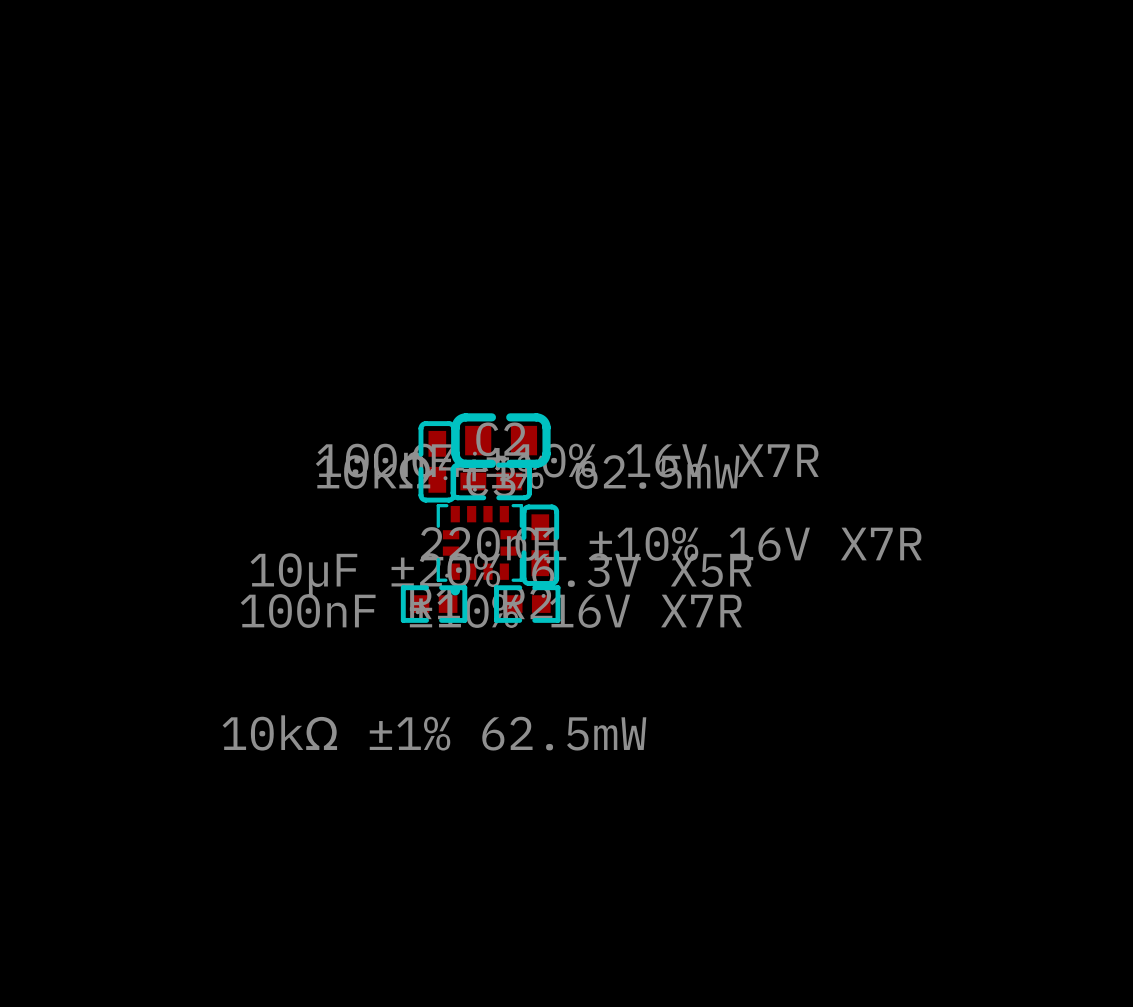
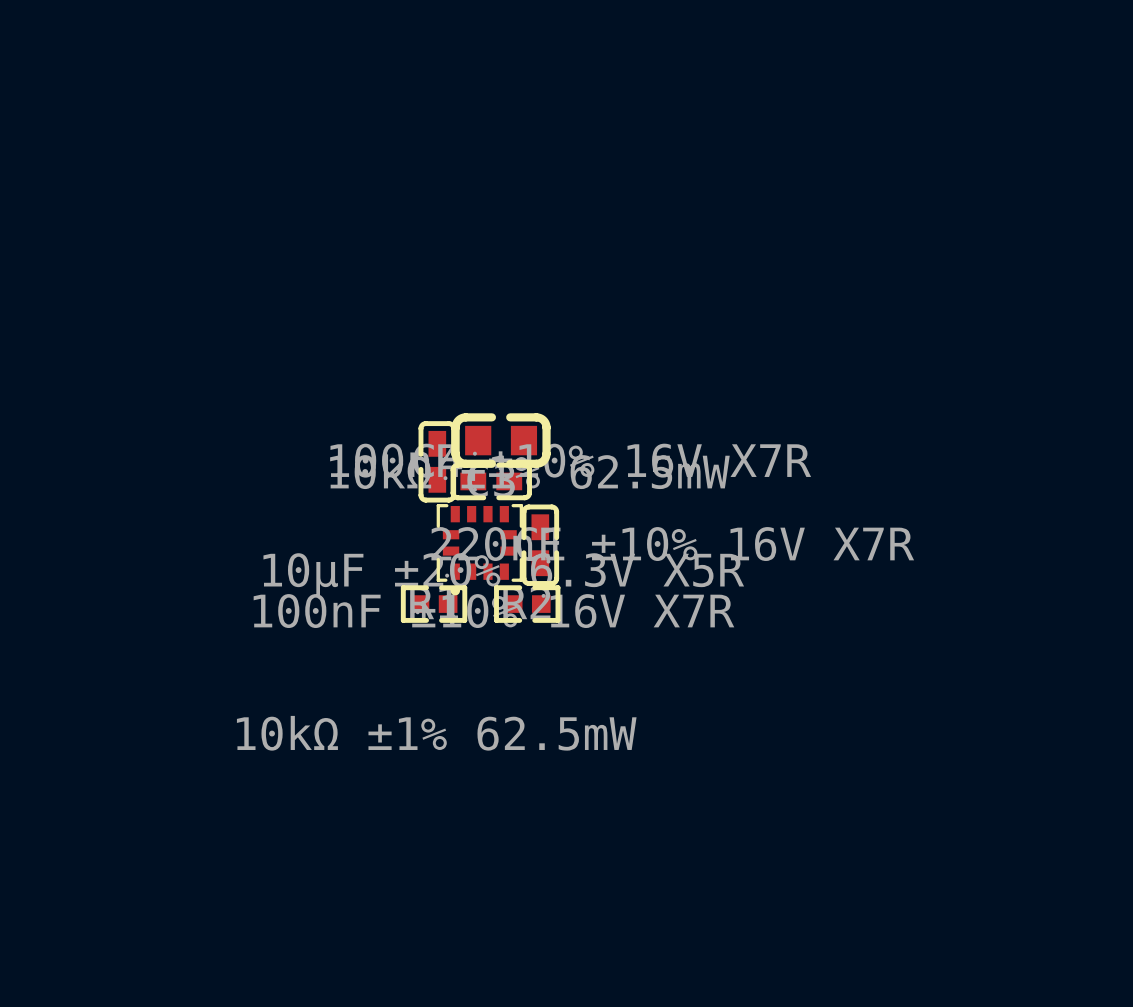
C2 name: C2 (501, 439) -> none

